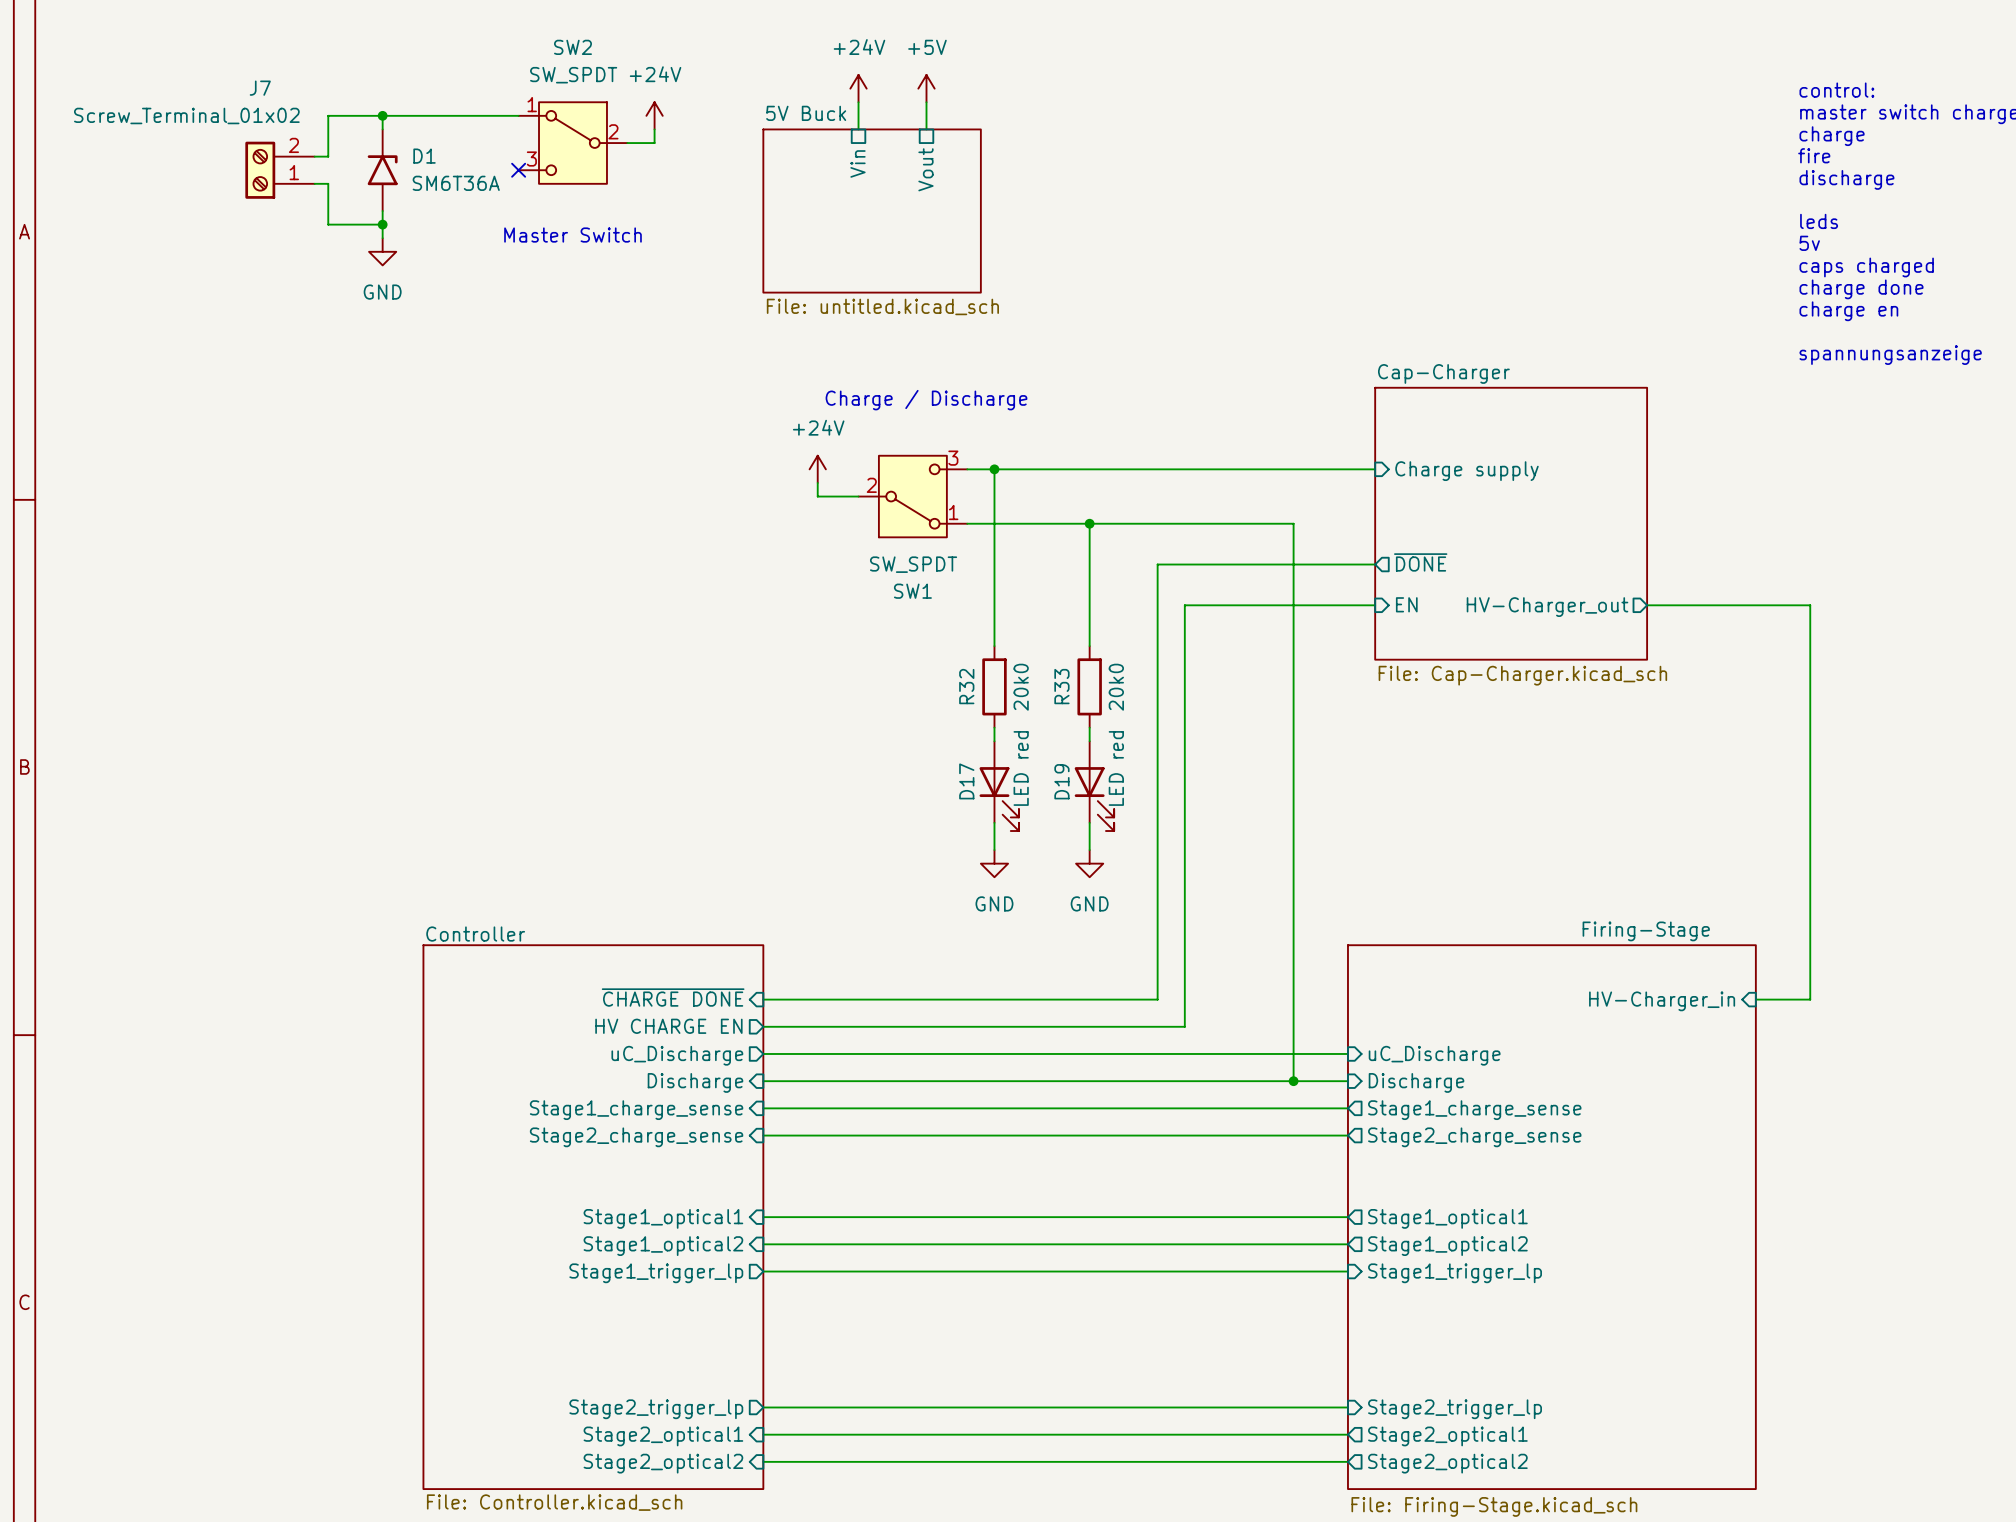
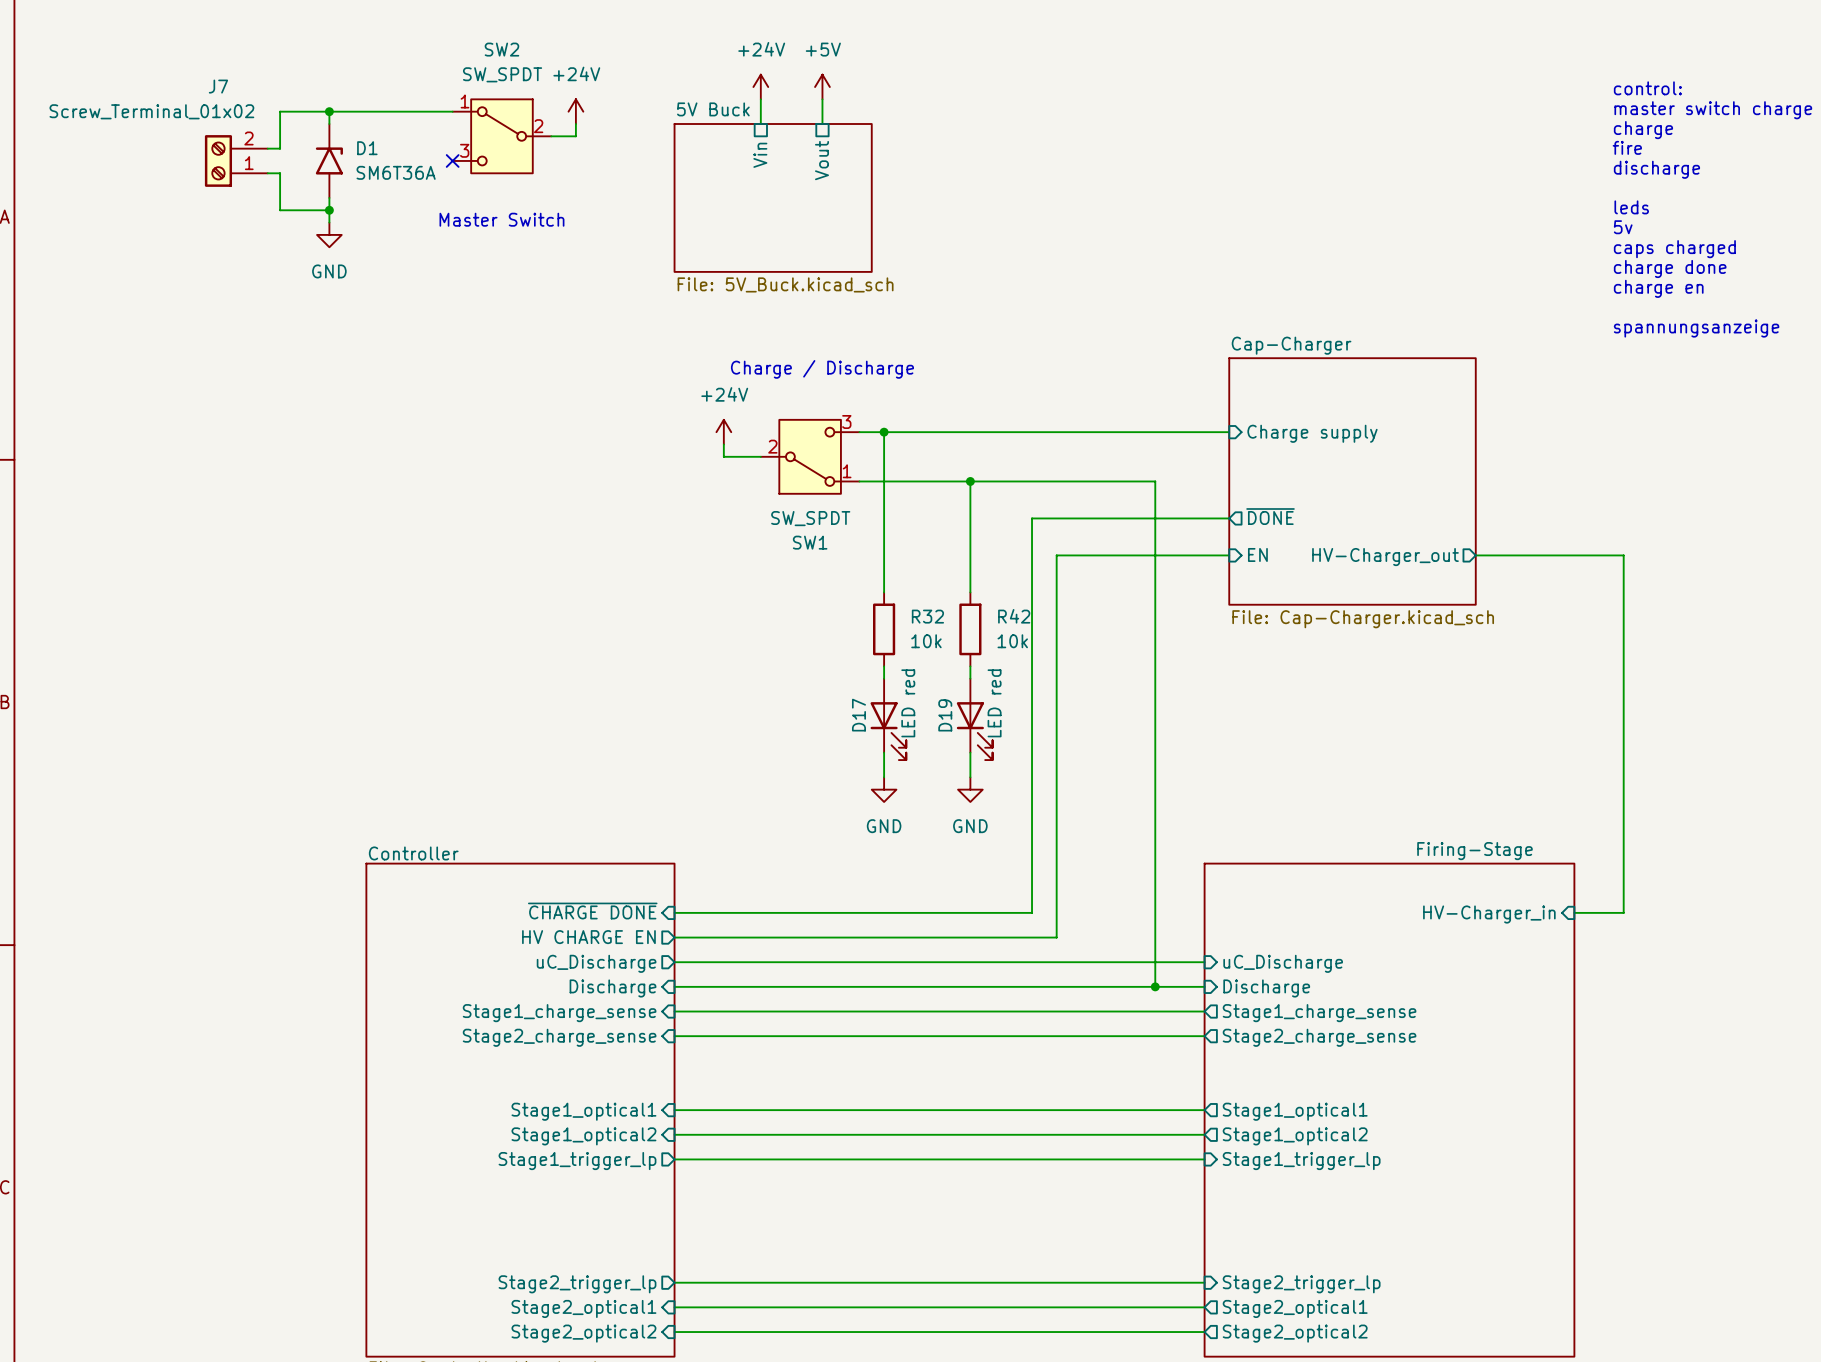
sheet 5V Buck value: File: untitled.kicad_sch (882, 306) -> File: 5V_Buck.kicad_sch (785, 284)
R32 name rotation: 0° (966, 686) -> 90° clockwise (927, 616)
R32 name position: R32 (966, 686) -> R32 (927, 616)
R33 name: R33 (1061, 686) -> R42 (1014, 616)
R32 value: 20k0 (1021, 687) -> 10k (926, 641)
R33 value: 20k0 (1116, 687) -> 10k (1012, 641)

